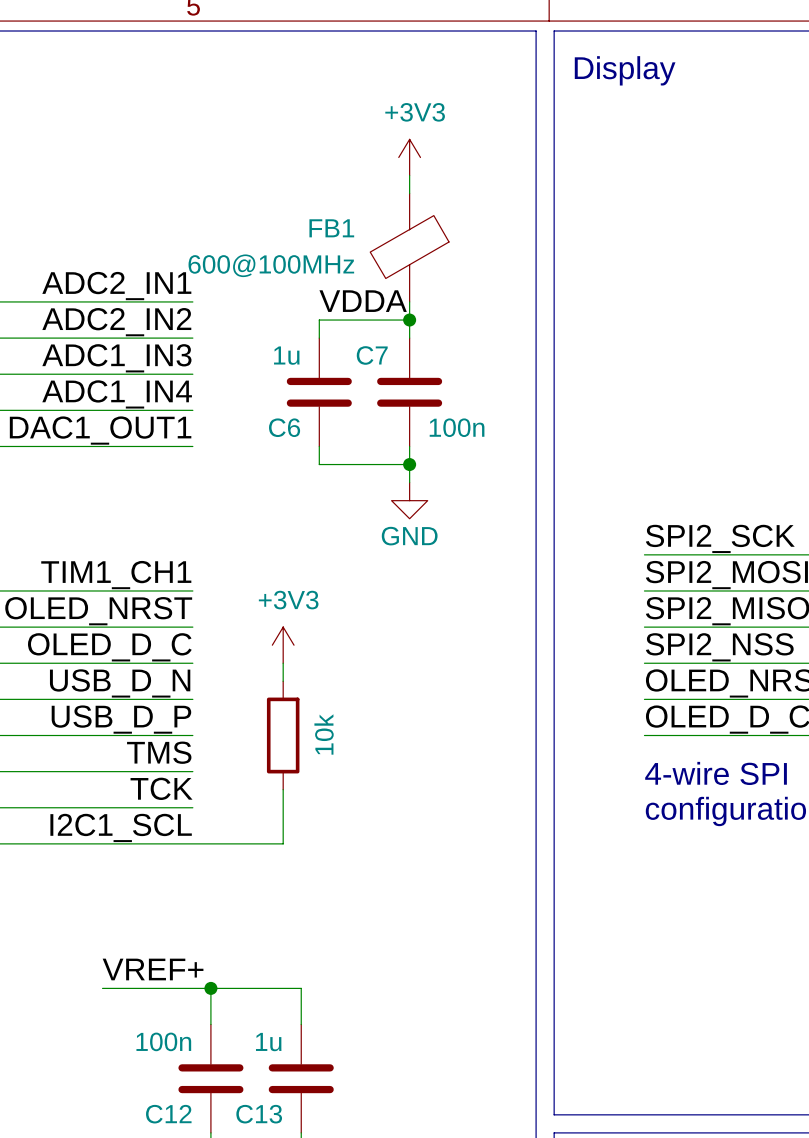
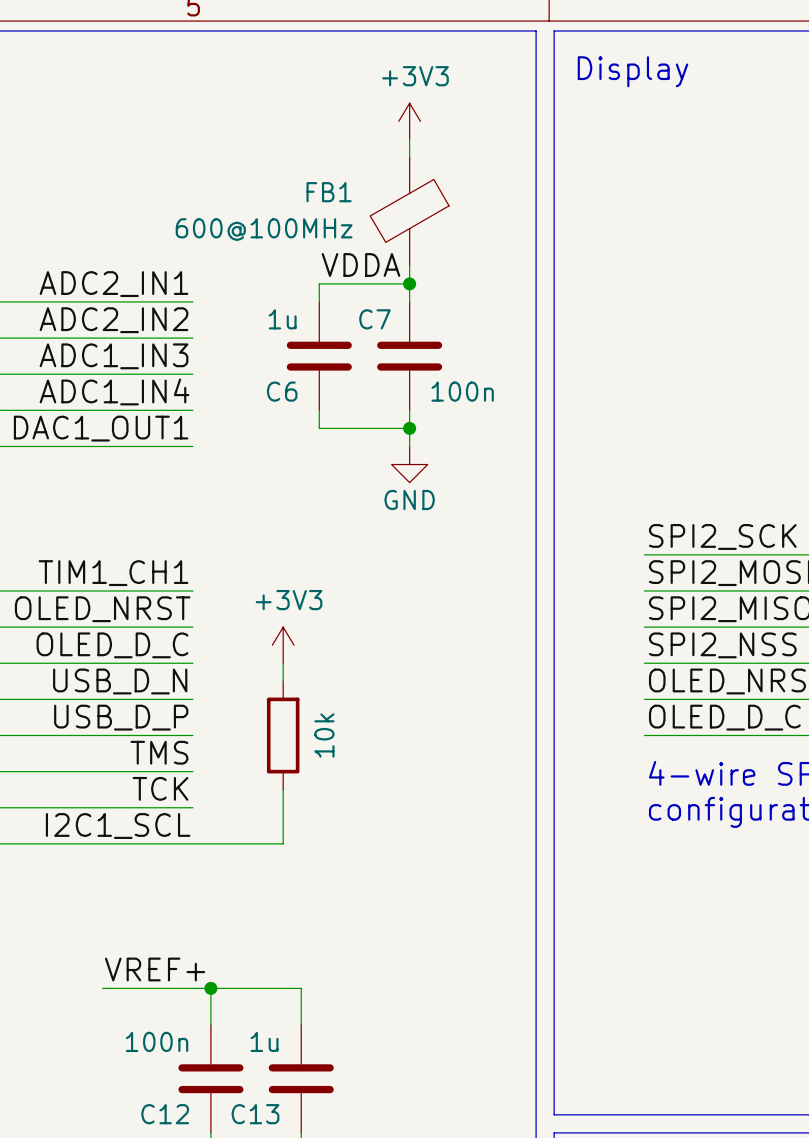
power symbol position: +3V3 (409, 157) -> +3V3 (409, 121)
FB1 position: (409, 247) -> (409, 211)
label position: VDDA (363, 301) -> VDDA (360, 264)
wire: (409, 320) (319, 320) (319, 338) -> (409, 283) (319, 283) (319, 301)
junction position: (409, 320) -> (409, 283)
C6 position: (319, 392) -> (319, 356)
C7 position: (409, 392) -> (409, 356)
wire: (319, 446) (319, 464) (409, 464) -> (319, 410) (319, 428) (409, 428)
junction position: (409, 464) -> (409, 428)
power symbol position: GND (409, 500) -> GND (409, 464)

